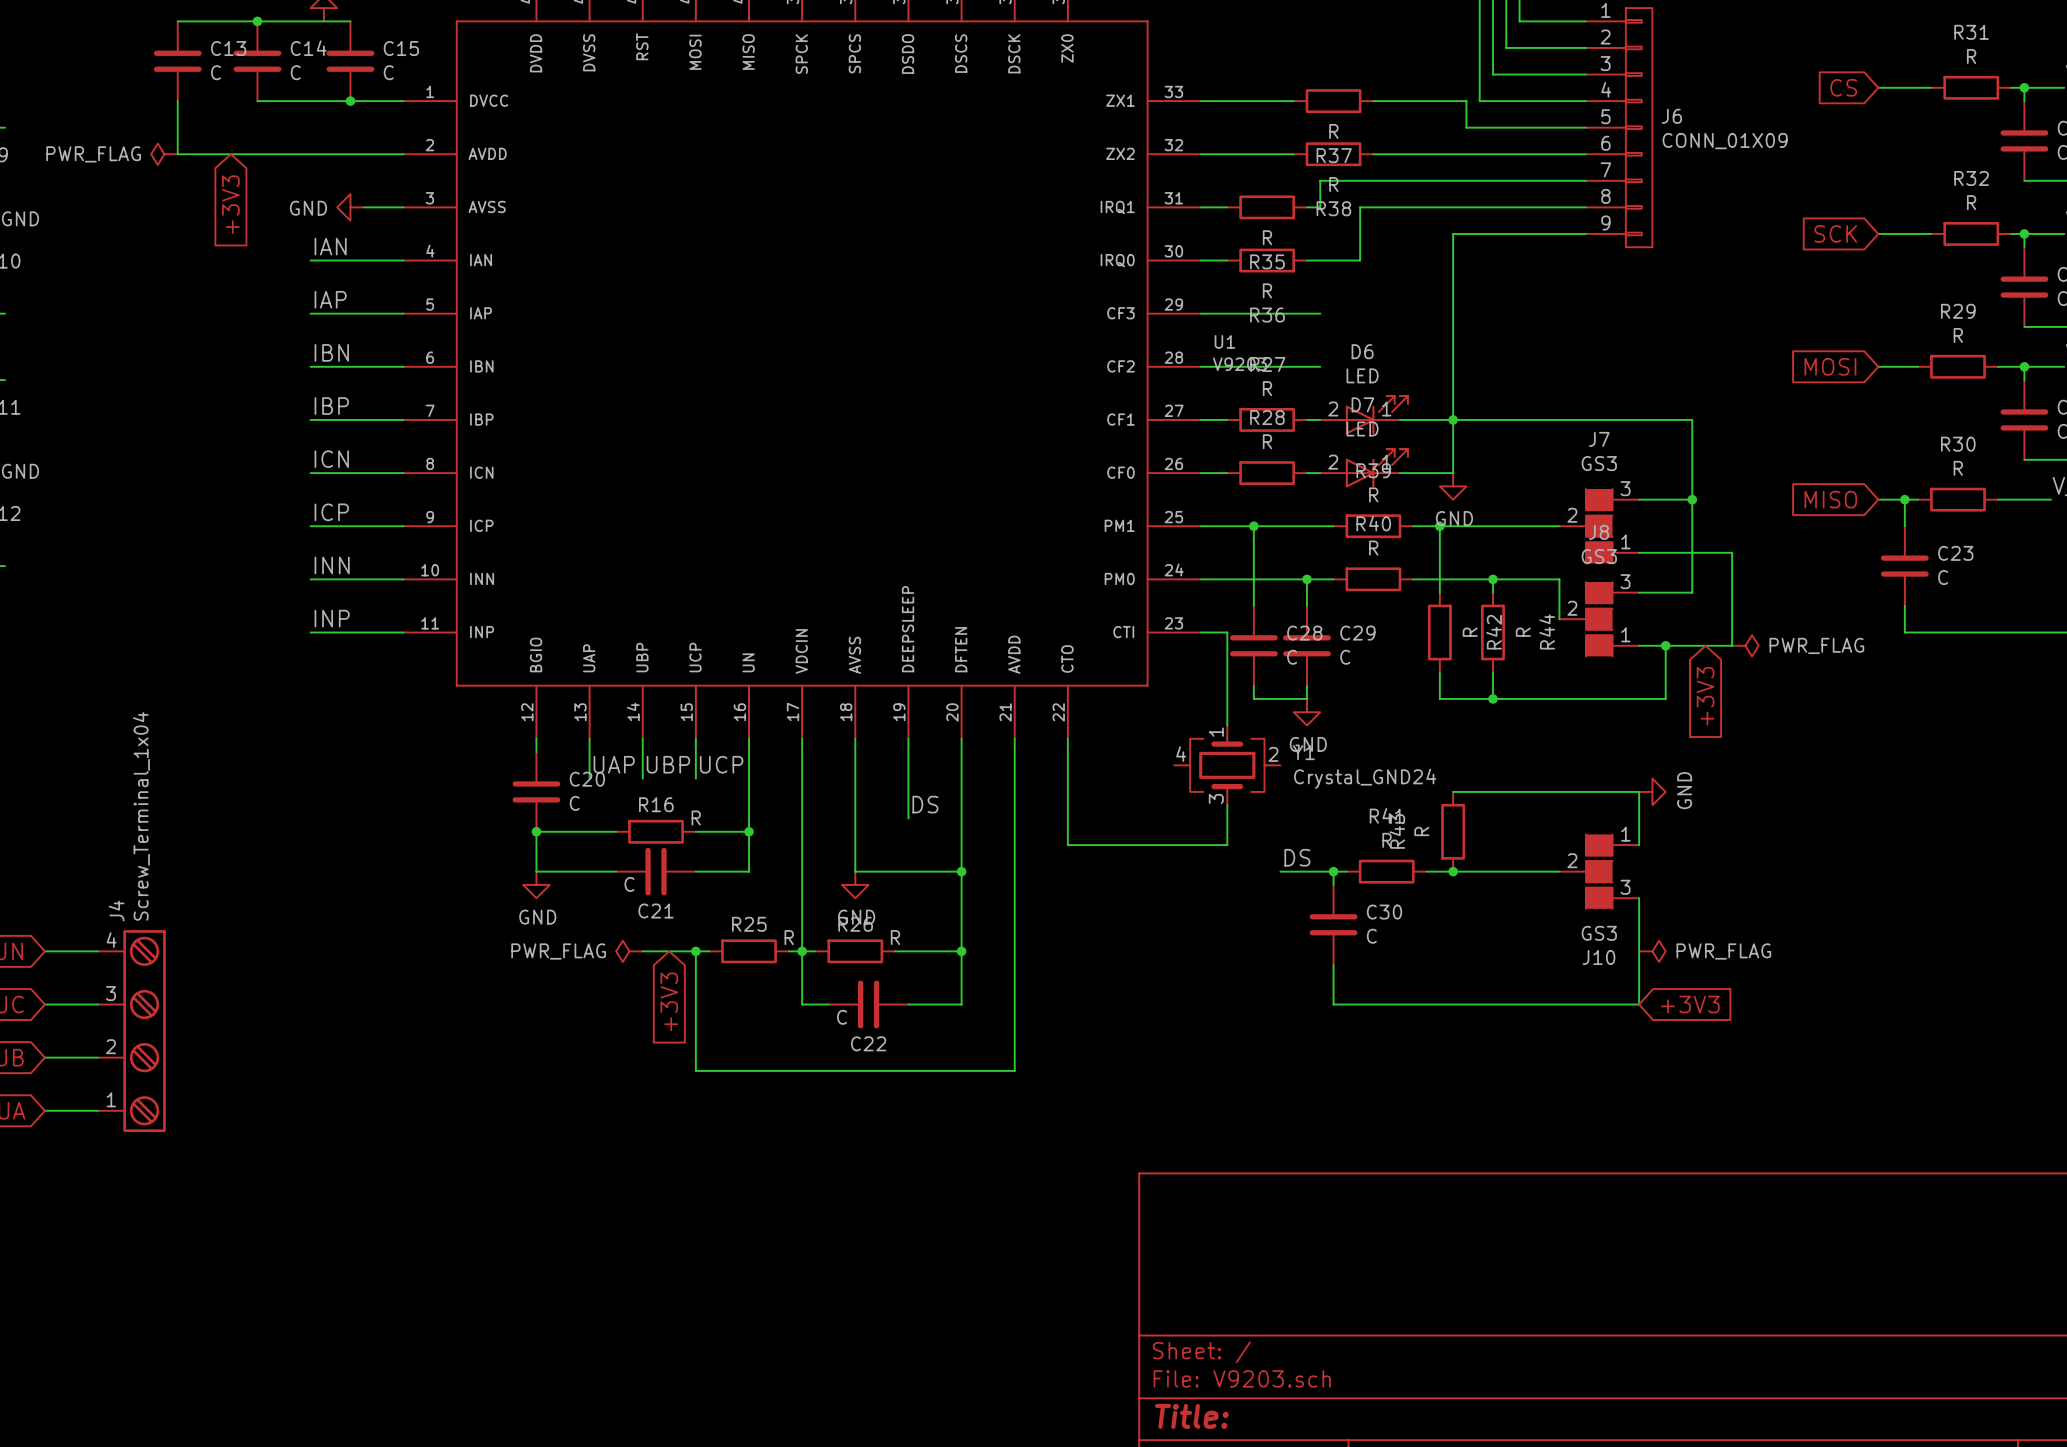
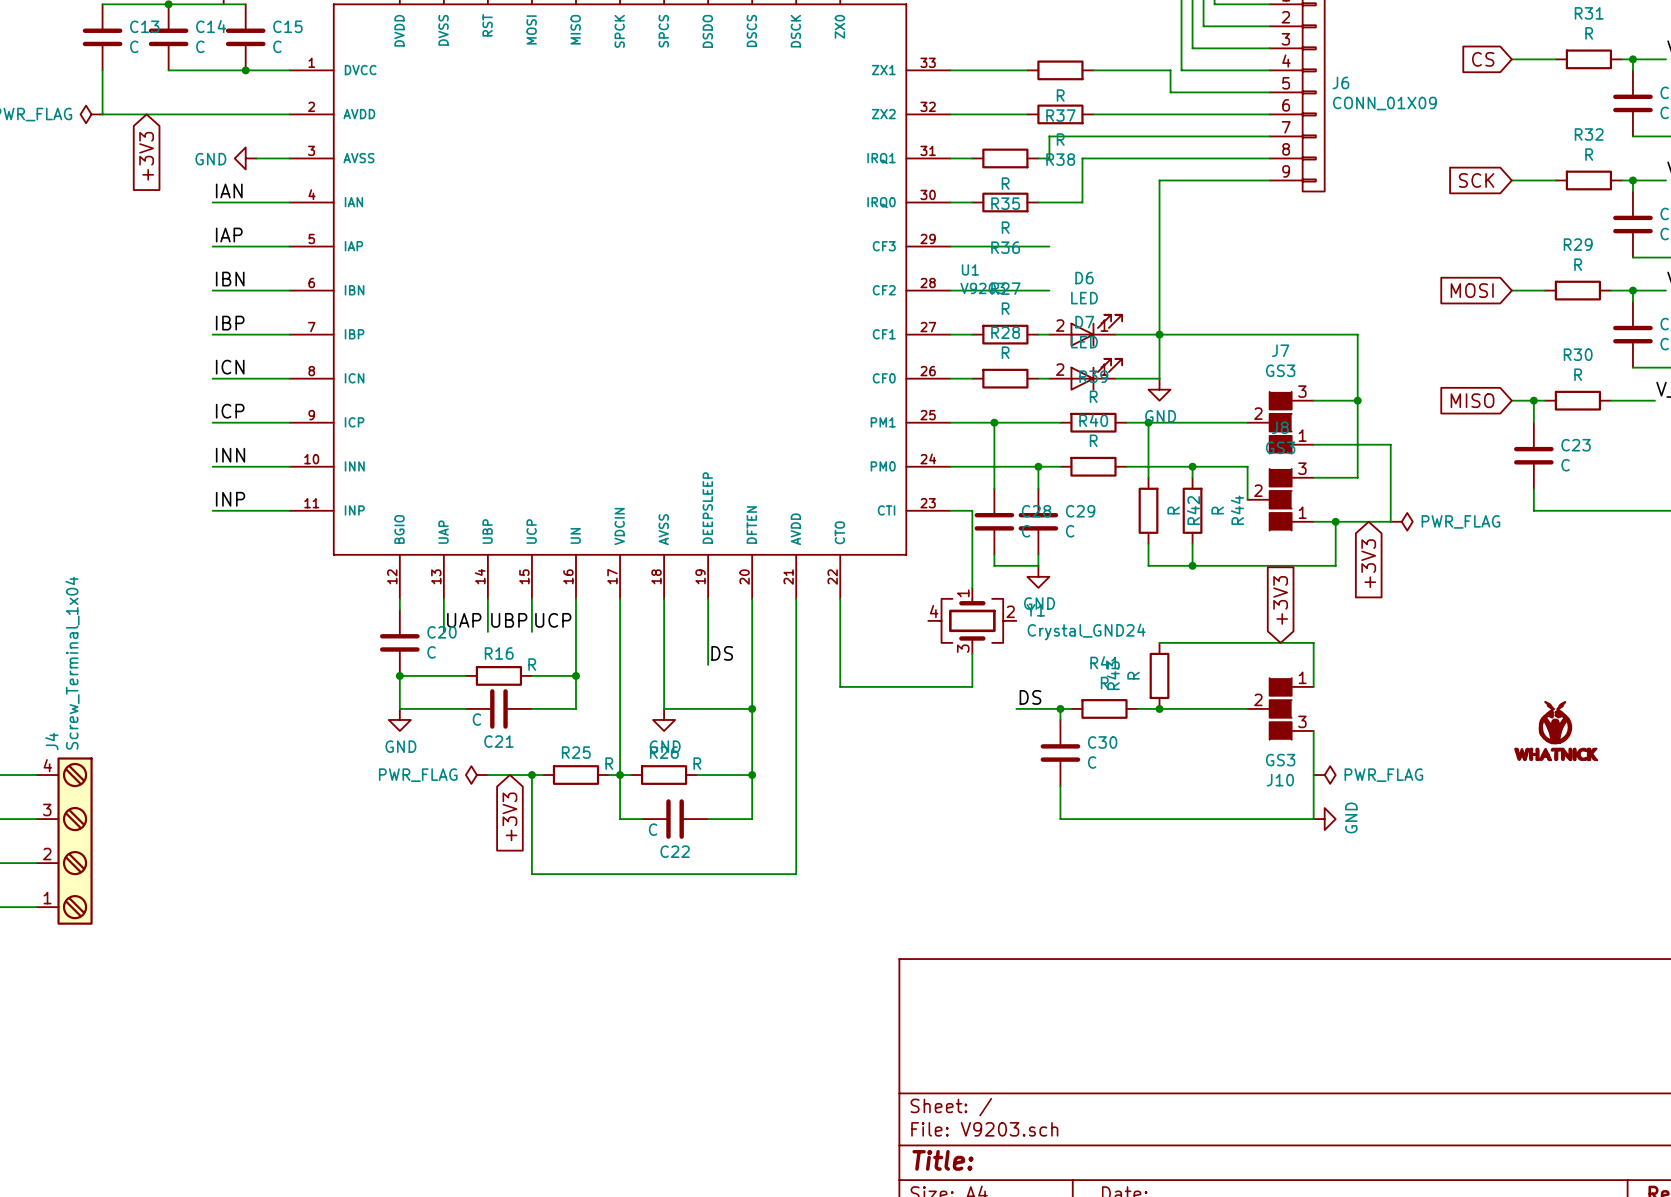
power symbol position: GND (1652, 791) -> GND (1324, 819)
part: none -> (1556, 731)
global label rotation: 0° (1690, 1004) -> 90° counterclockwise (1280, 600)
global label position: +3V3 (1690, 1004) -> +3V3 (1280, 600)

